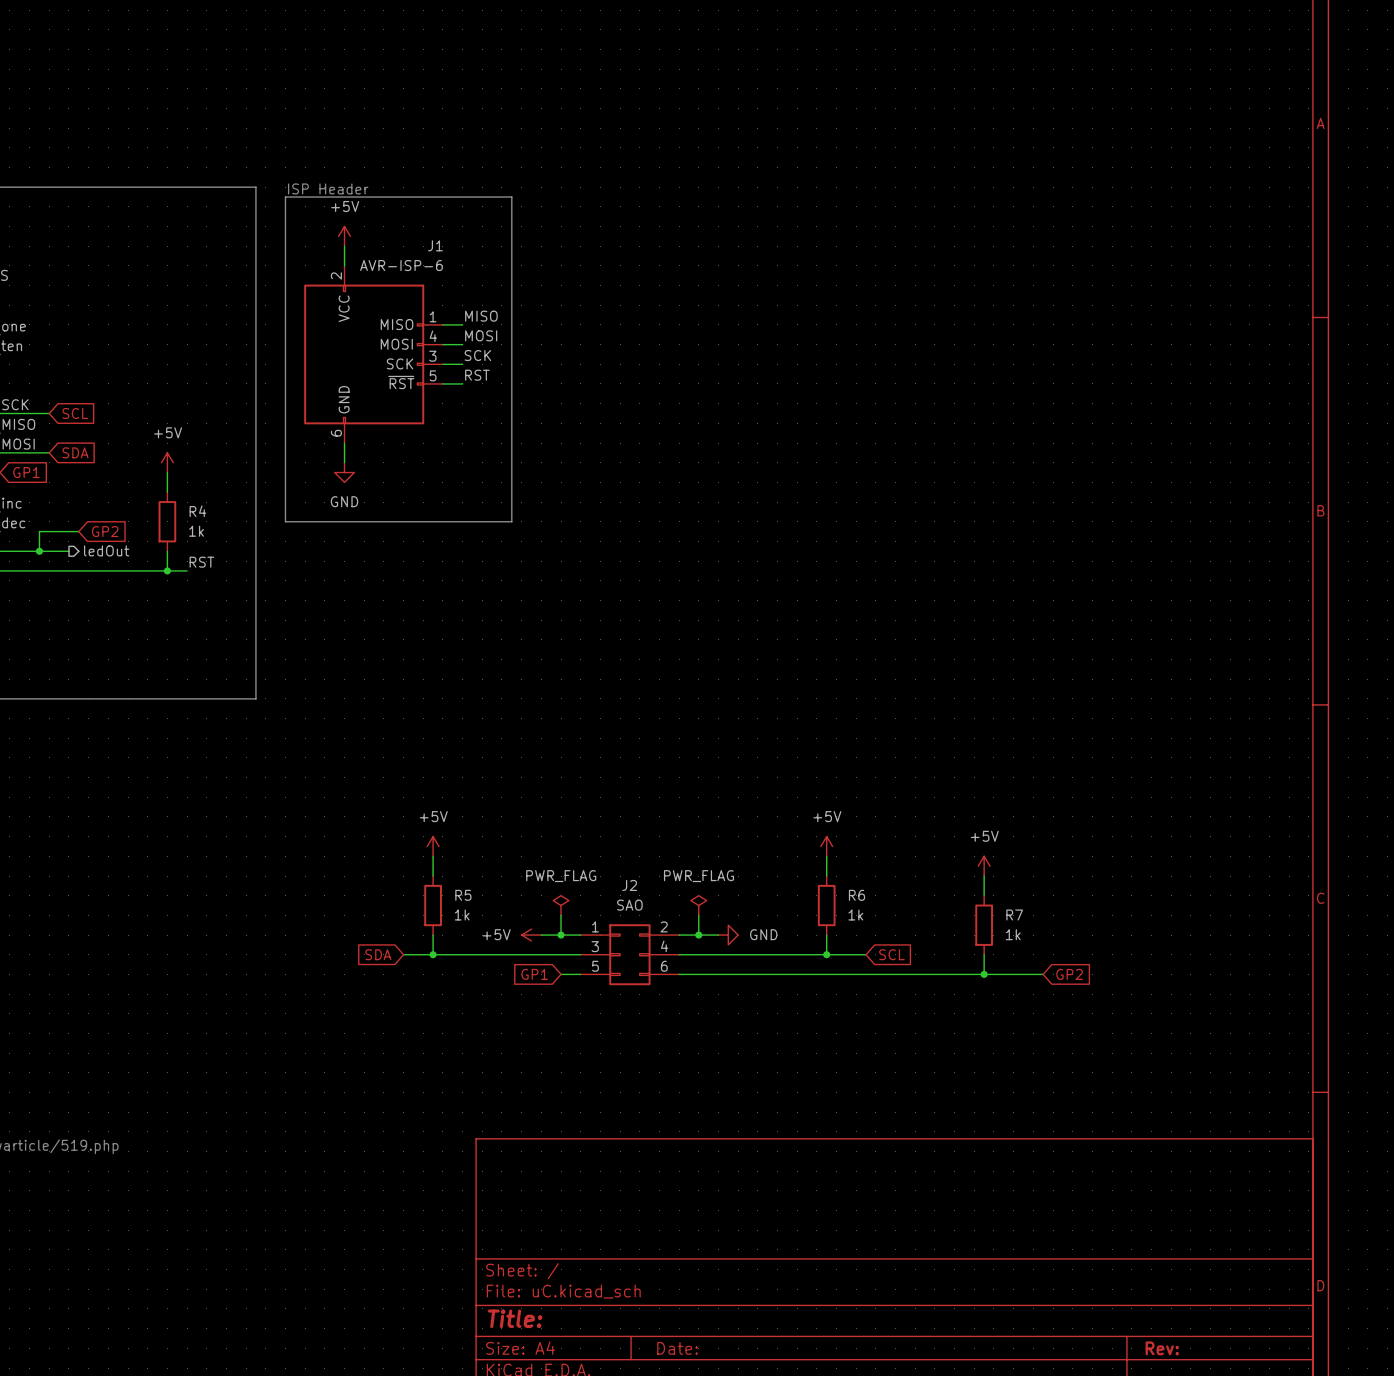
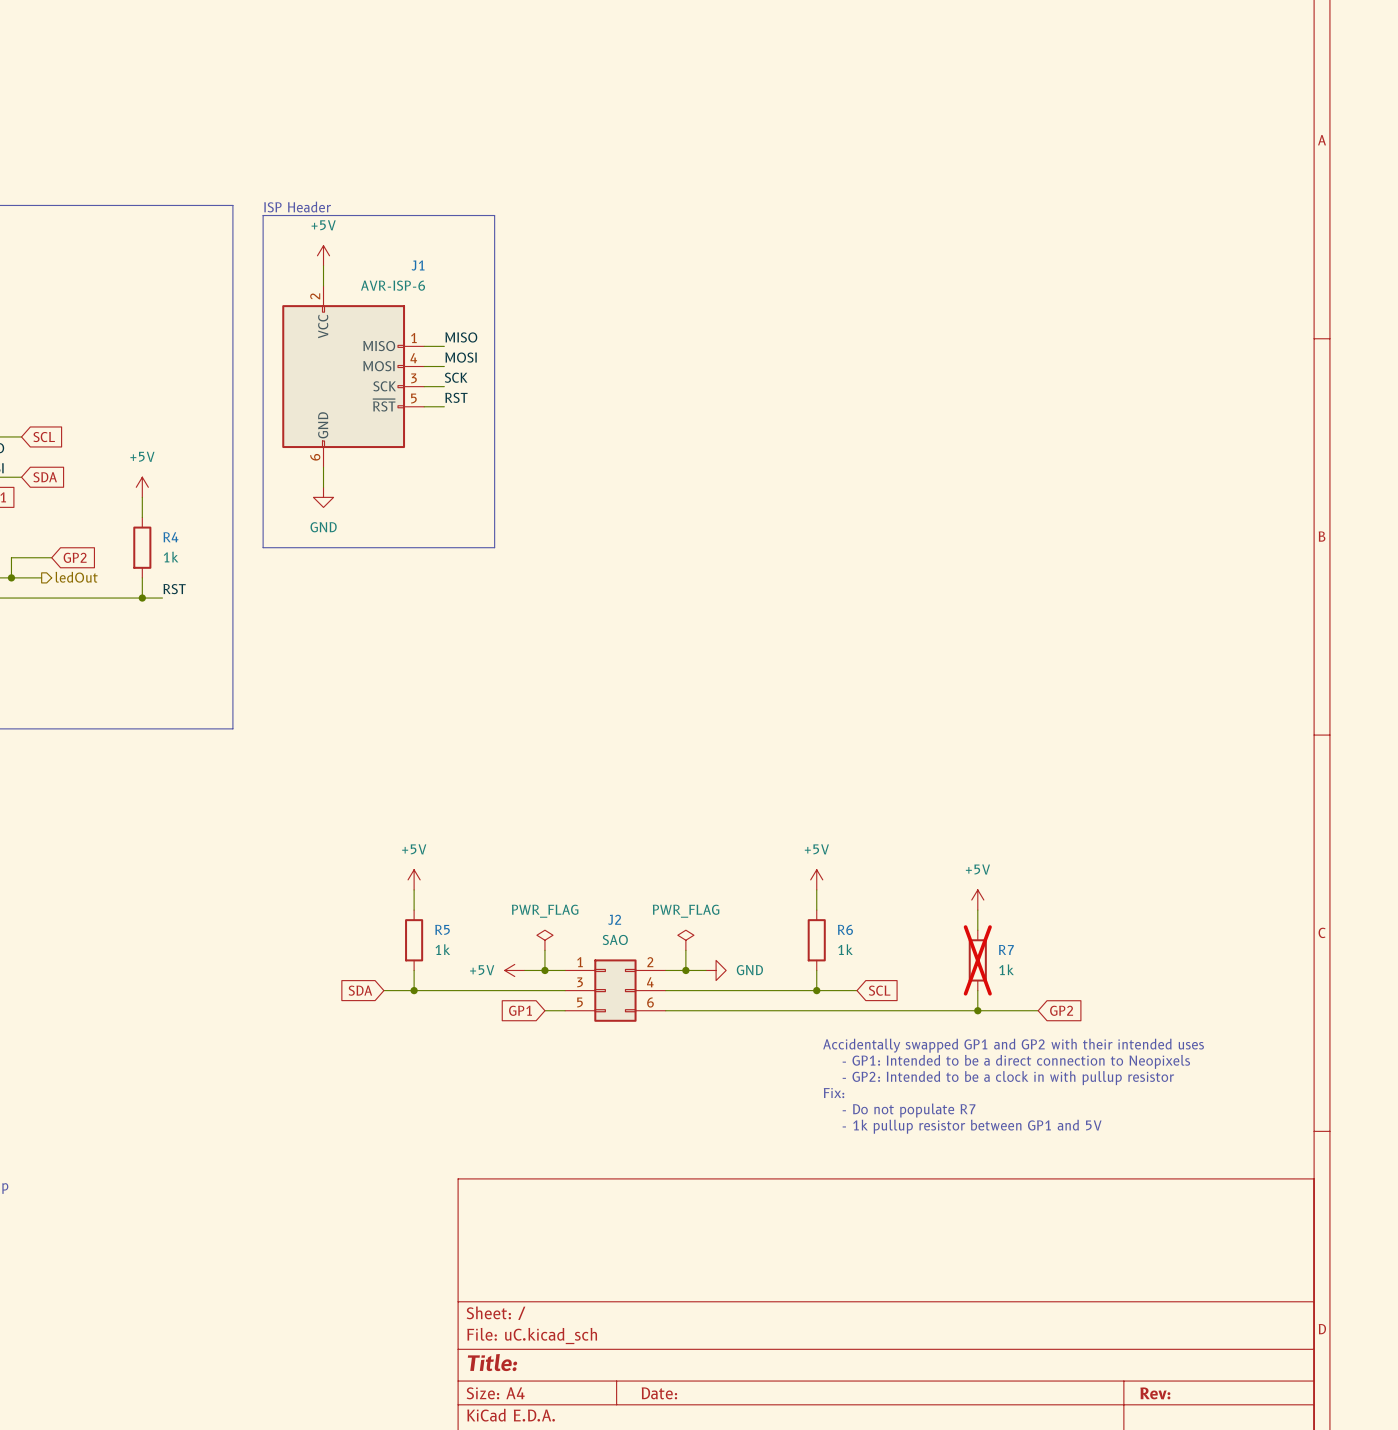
R7 do-not-place cross: none -> (977, 960)
text: none -> Accidentally swapped GP1 and GP2 with their intended uses (1013, 1045)
text: none -> - GP1: Intended to be a direct connection to Neopixels (1016, 1061)
text: none -> - GP2: Intended to be a clock in with pullup resistor (1008, 1078)
text: none -> Fix: (834, 1093)
text: none -> - Do not populate R7 (909, 1110)
text: none -> - 1k pullup resistor between GP1 and 5V (972, 1126)

